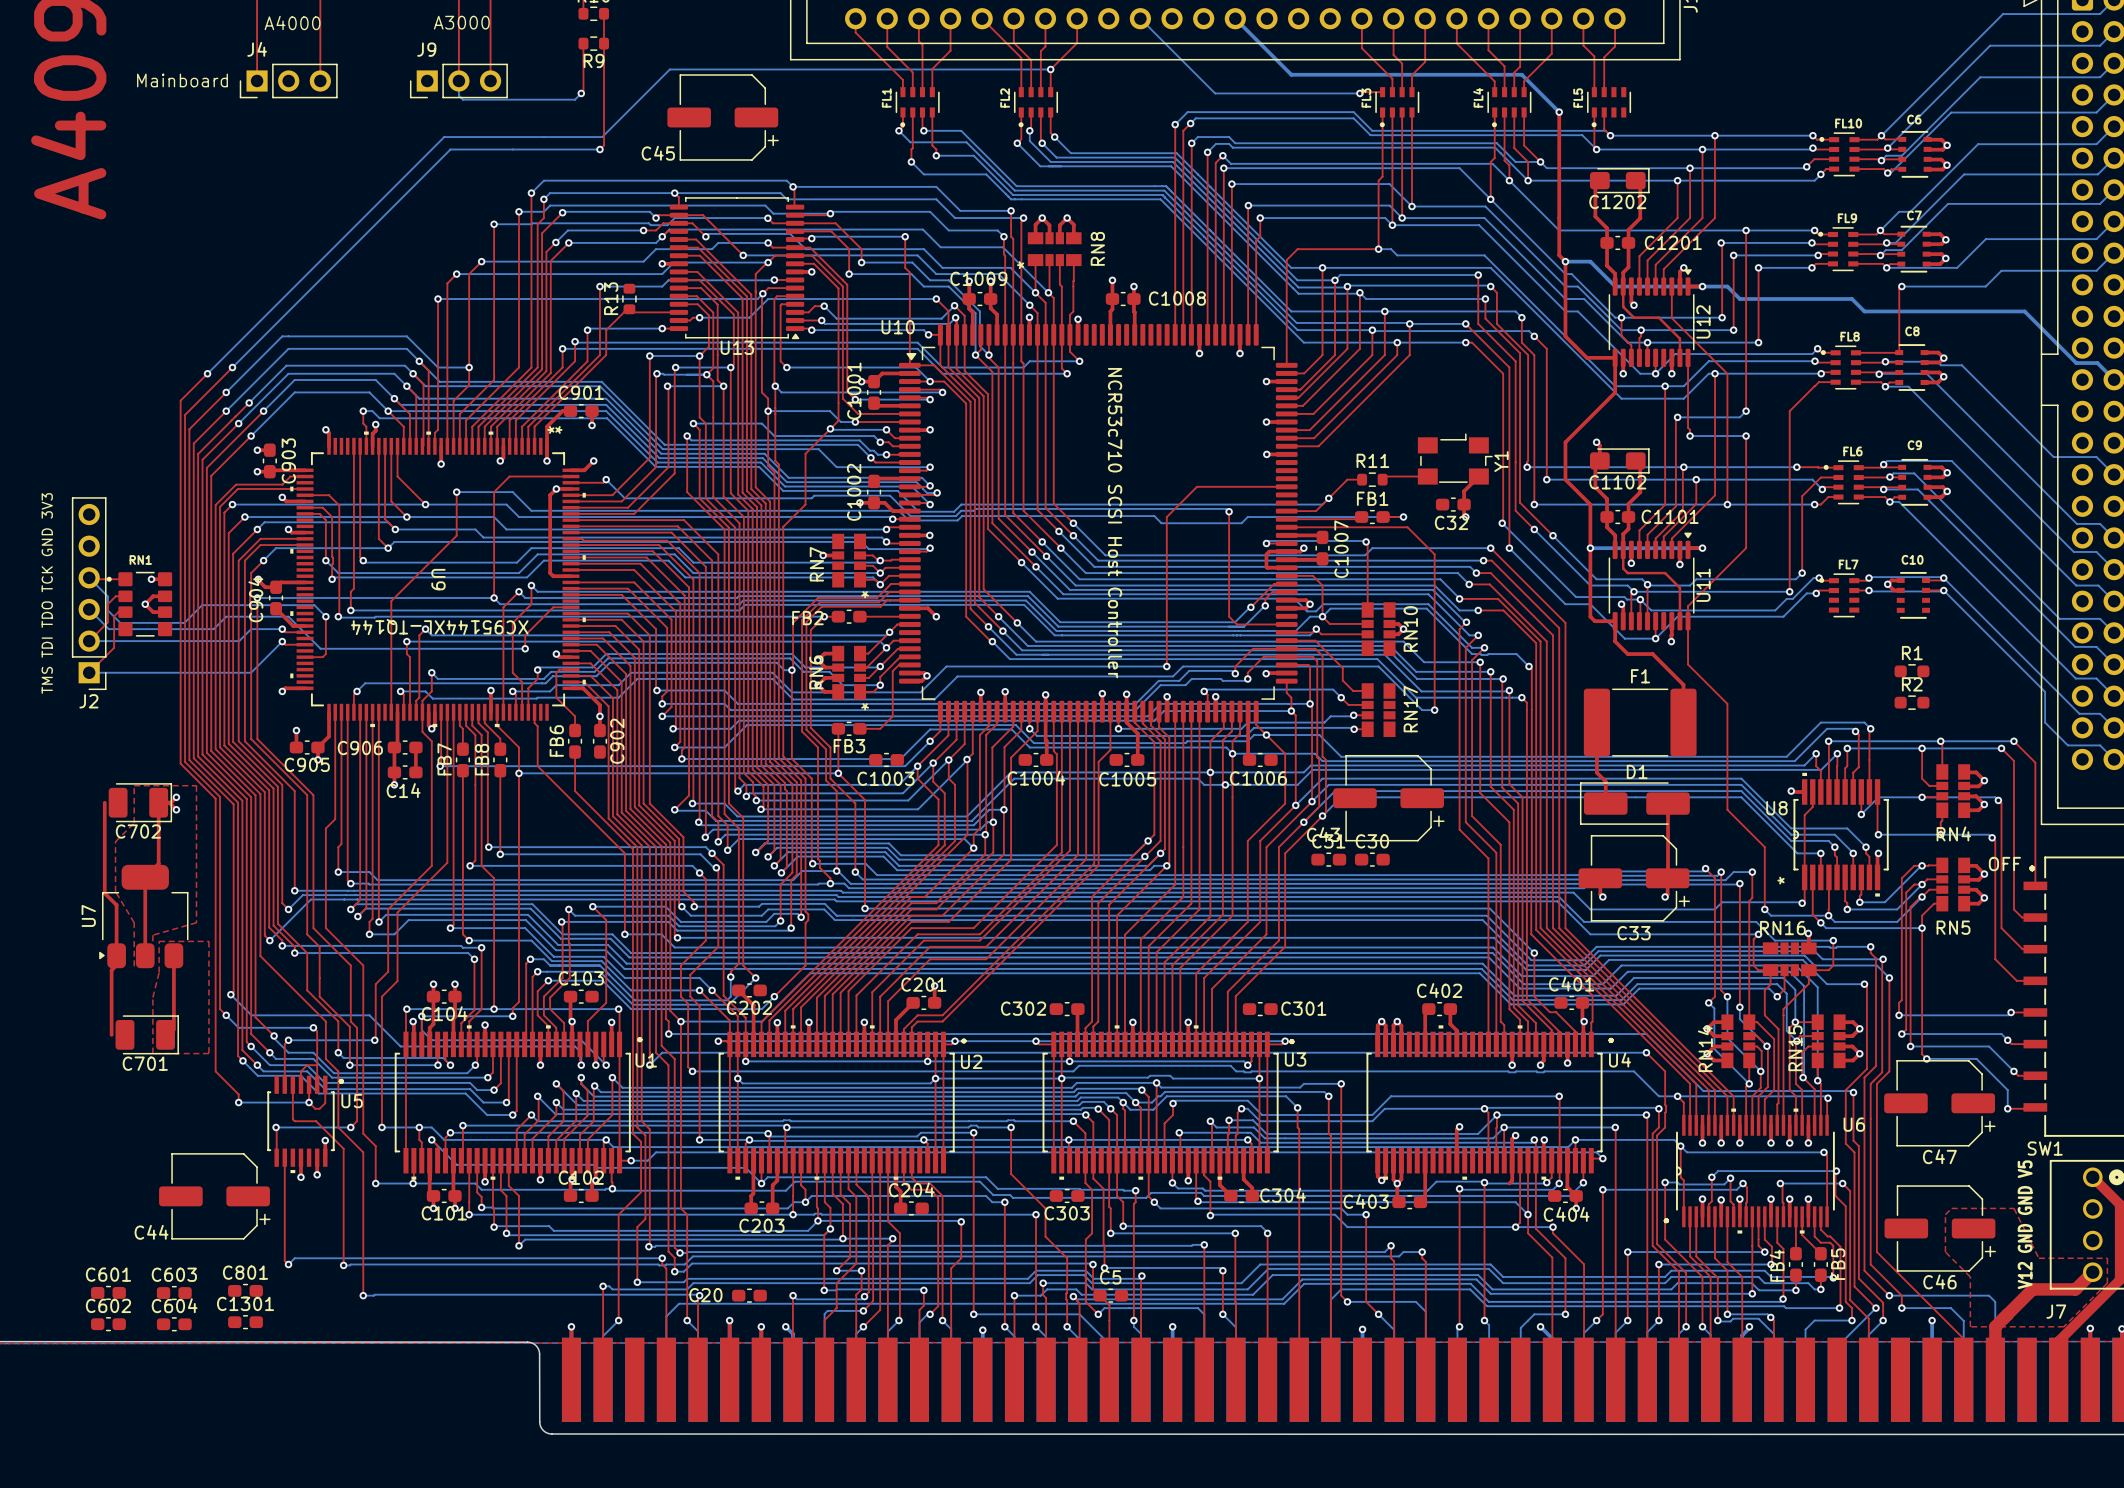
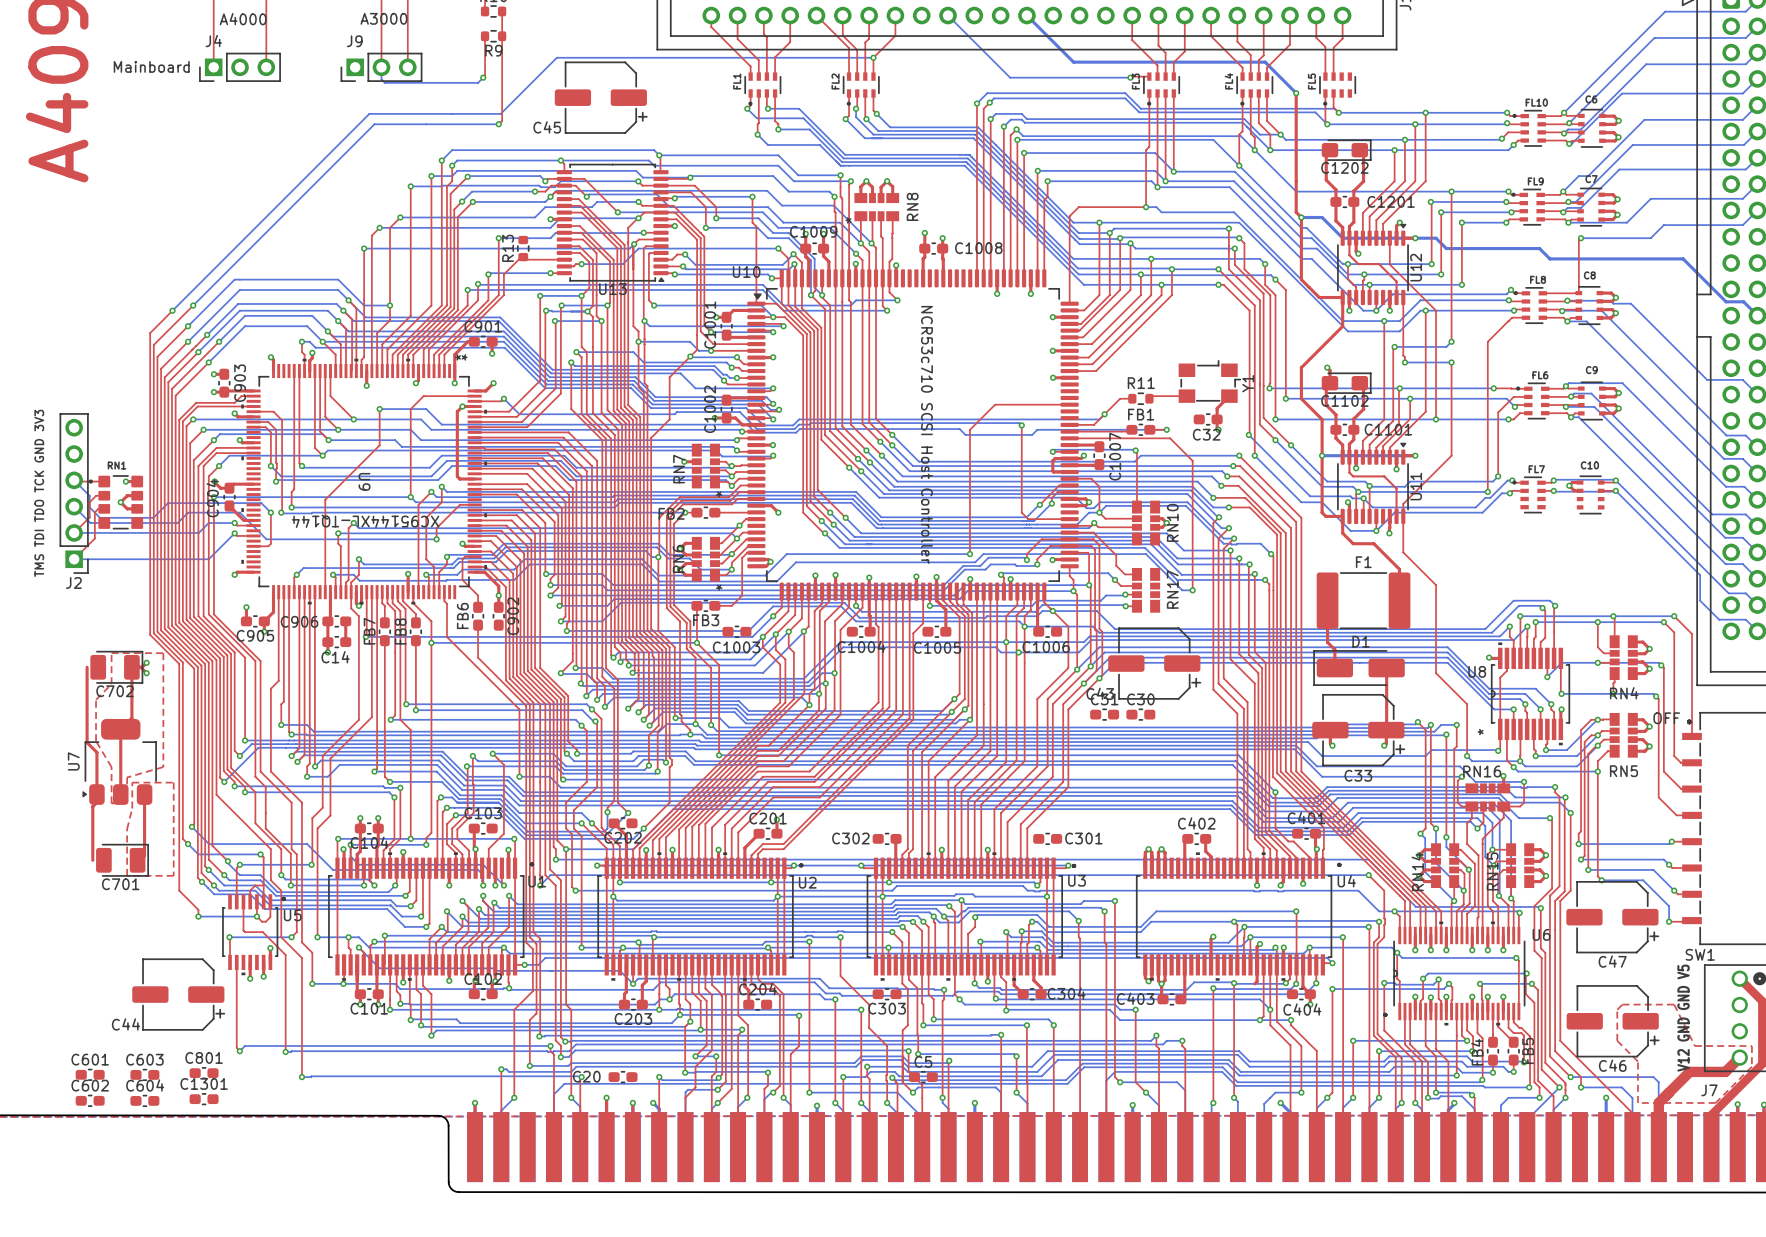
R1: (1912, 671) -> none
R2: (1912, 702) -> none

